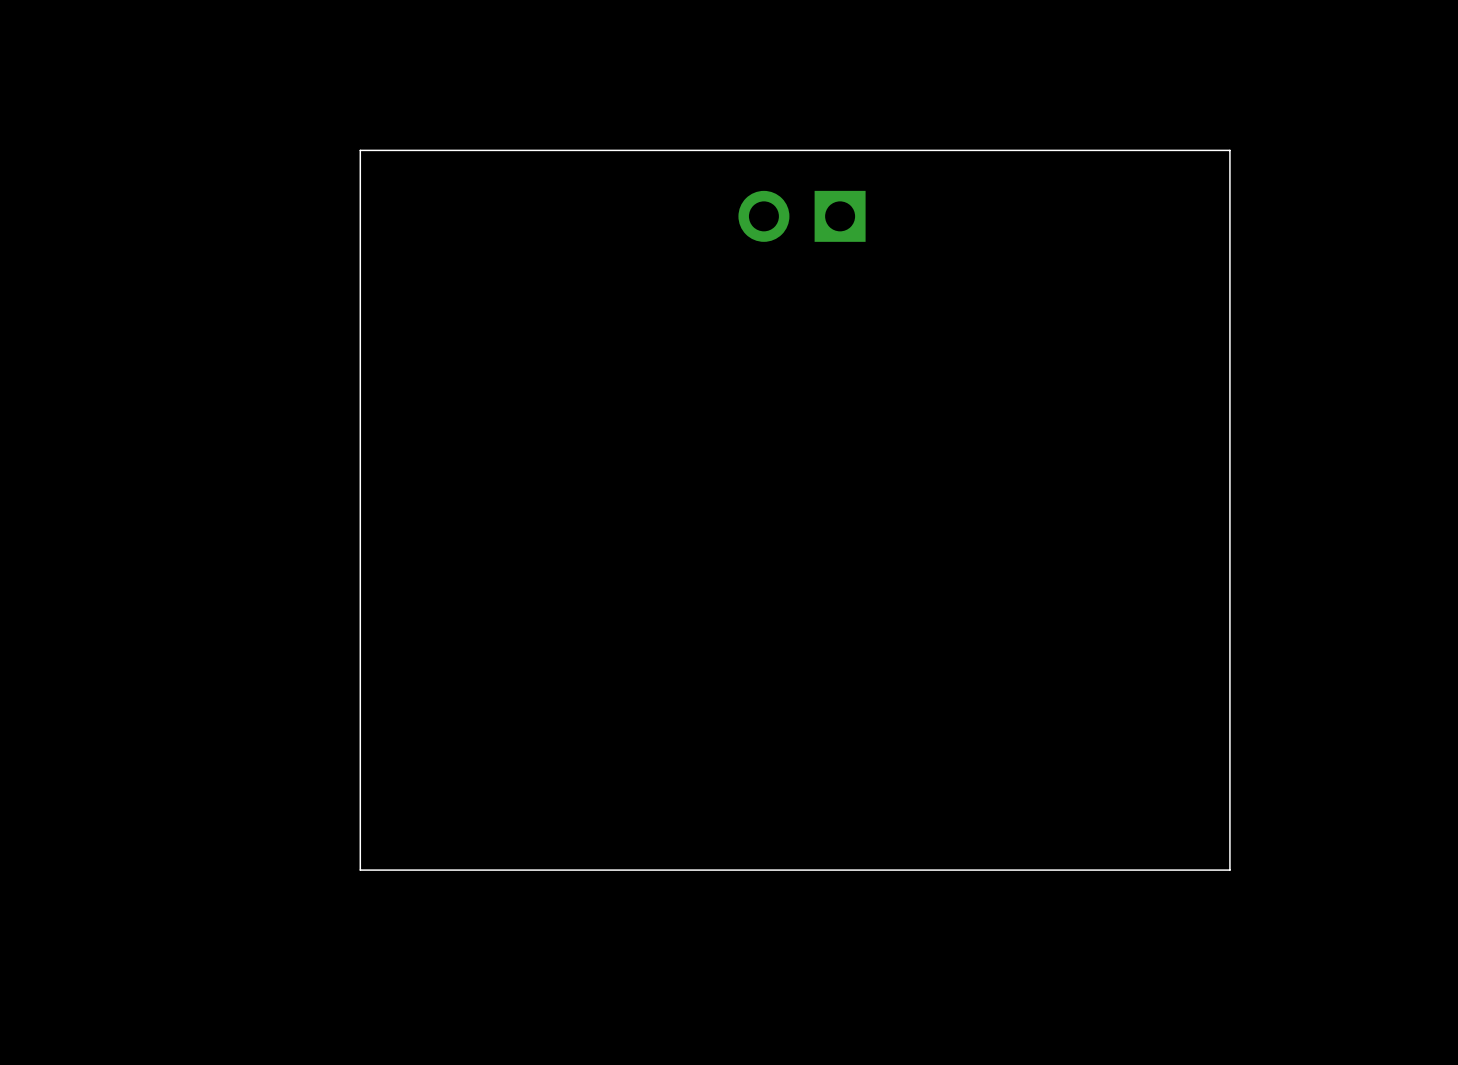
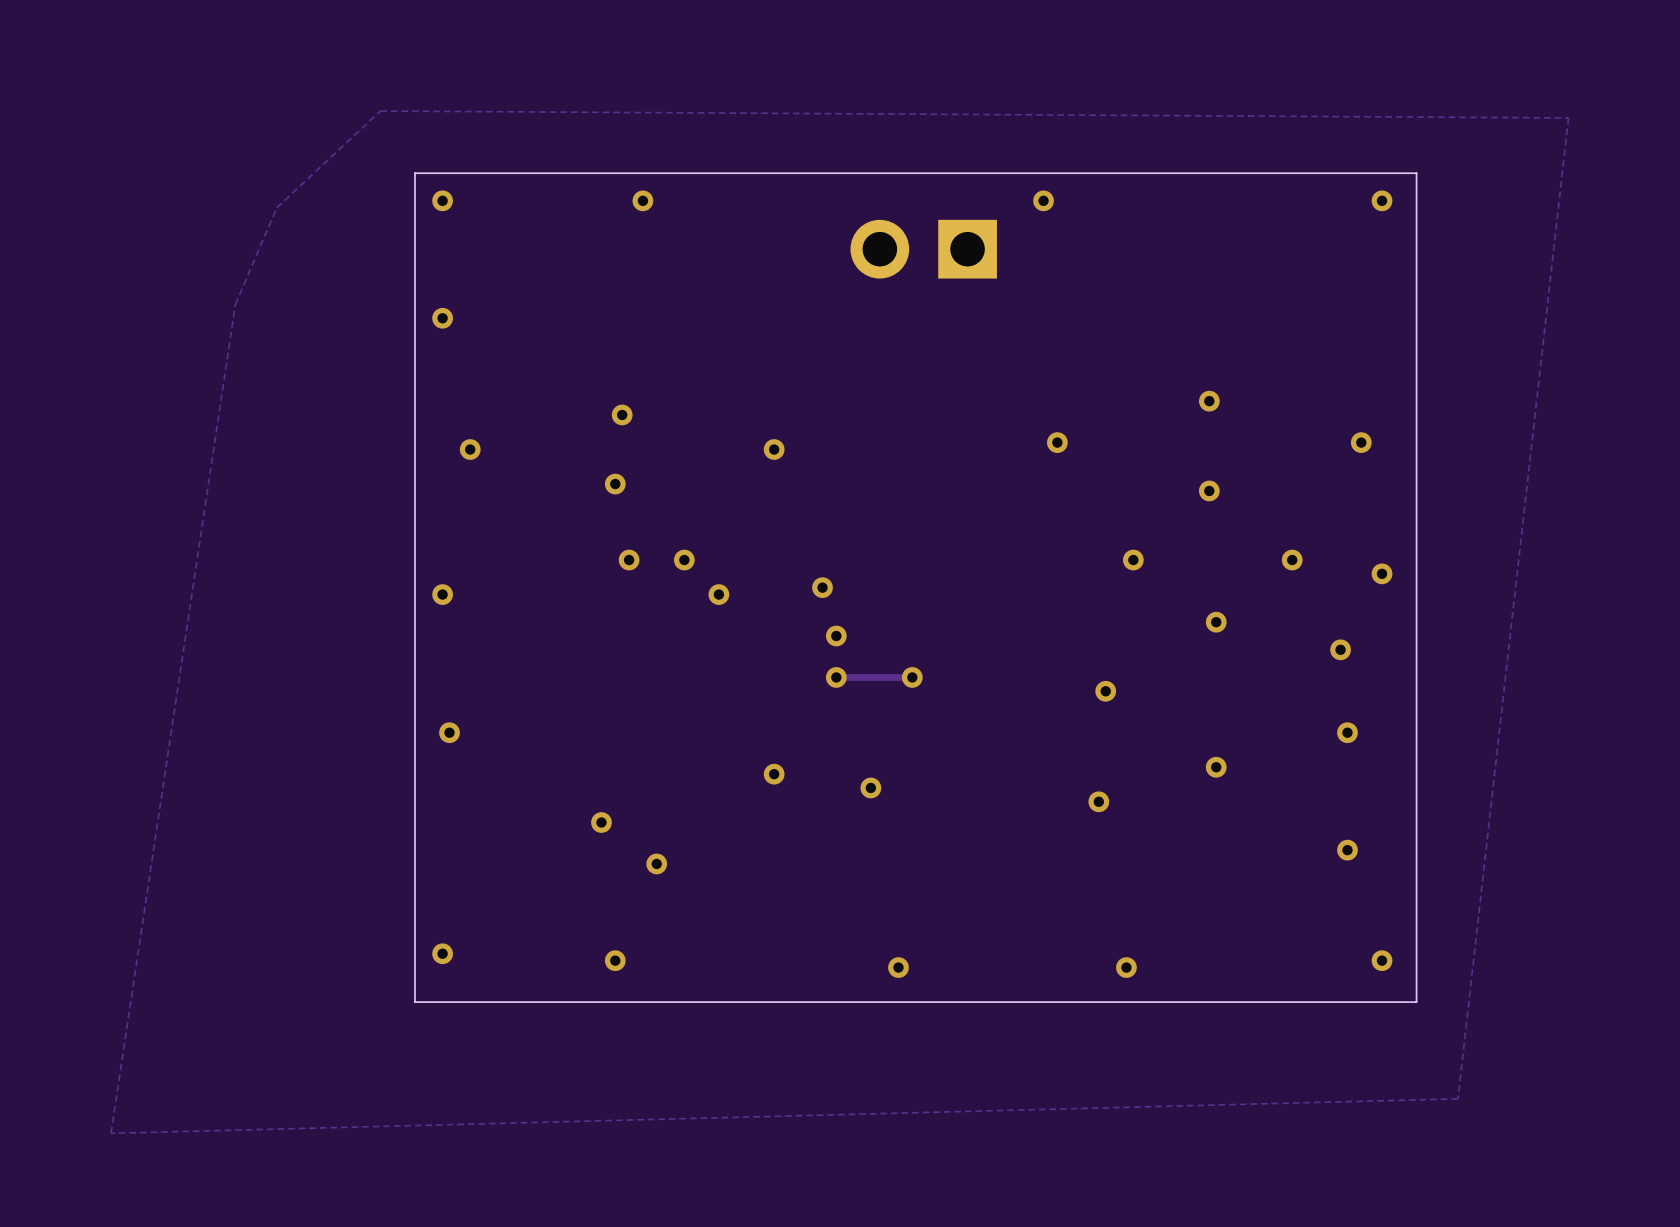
zone outline: none -> (380, 111) (276, 207) (235, 304) (111, 1133) (1458, 1098) (1568, 117) (380, 111)
via: none -> (442, 200)
via: none -> (642, 200)
via: none -> (1043, 200)
via: none -> (1382, 200)
via: none -> (442, 318)
via: none -> (1209, 401)
via: none -> (622, 414)
via: none -> (1057, 442)
via: none -> (1361, 442)
via: none -> (470, 449)
via: none -> (774, 449)
via: none -> (615, 484)
via: none -> (1209, 490)
via: none -> (629, 560)
via: none -> (684, 560)
via: none -> (1133, 560)
via: none -> (1292, 560)
via: none -> (1382, 573)
via: none -> (822, 587)
via: none -> (442, 594)
via: none -> (718, 594)
via: none -> (1216, 622)
via: none -> (836, 636)
via: none -> (1340, 649)
via: none -> (836, 677)
track: none -> (912, 677) (836, 677)
via: none -> (912, 677)
via: none -> (1105, 691)
via: none -> (449, 732)
via: none -> (1347, 732)
via: none -> (1216, 767)
via: none -> (774, 774)
via: none -> (870, 787)
via: none -> (1098, 801)
via: none -> (601, 822)
via: none -> (1347, 850)
via: none -> (656, 863)
via: none -> (442, 953)
via: none -> (615, 960)
via: none -> (1382, 960)
via: none -> (898, 967)
via: none -> (1126, 967)

